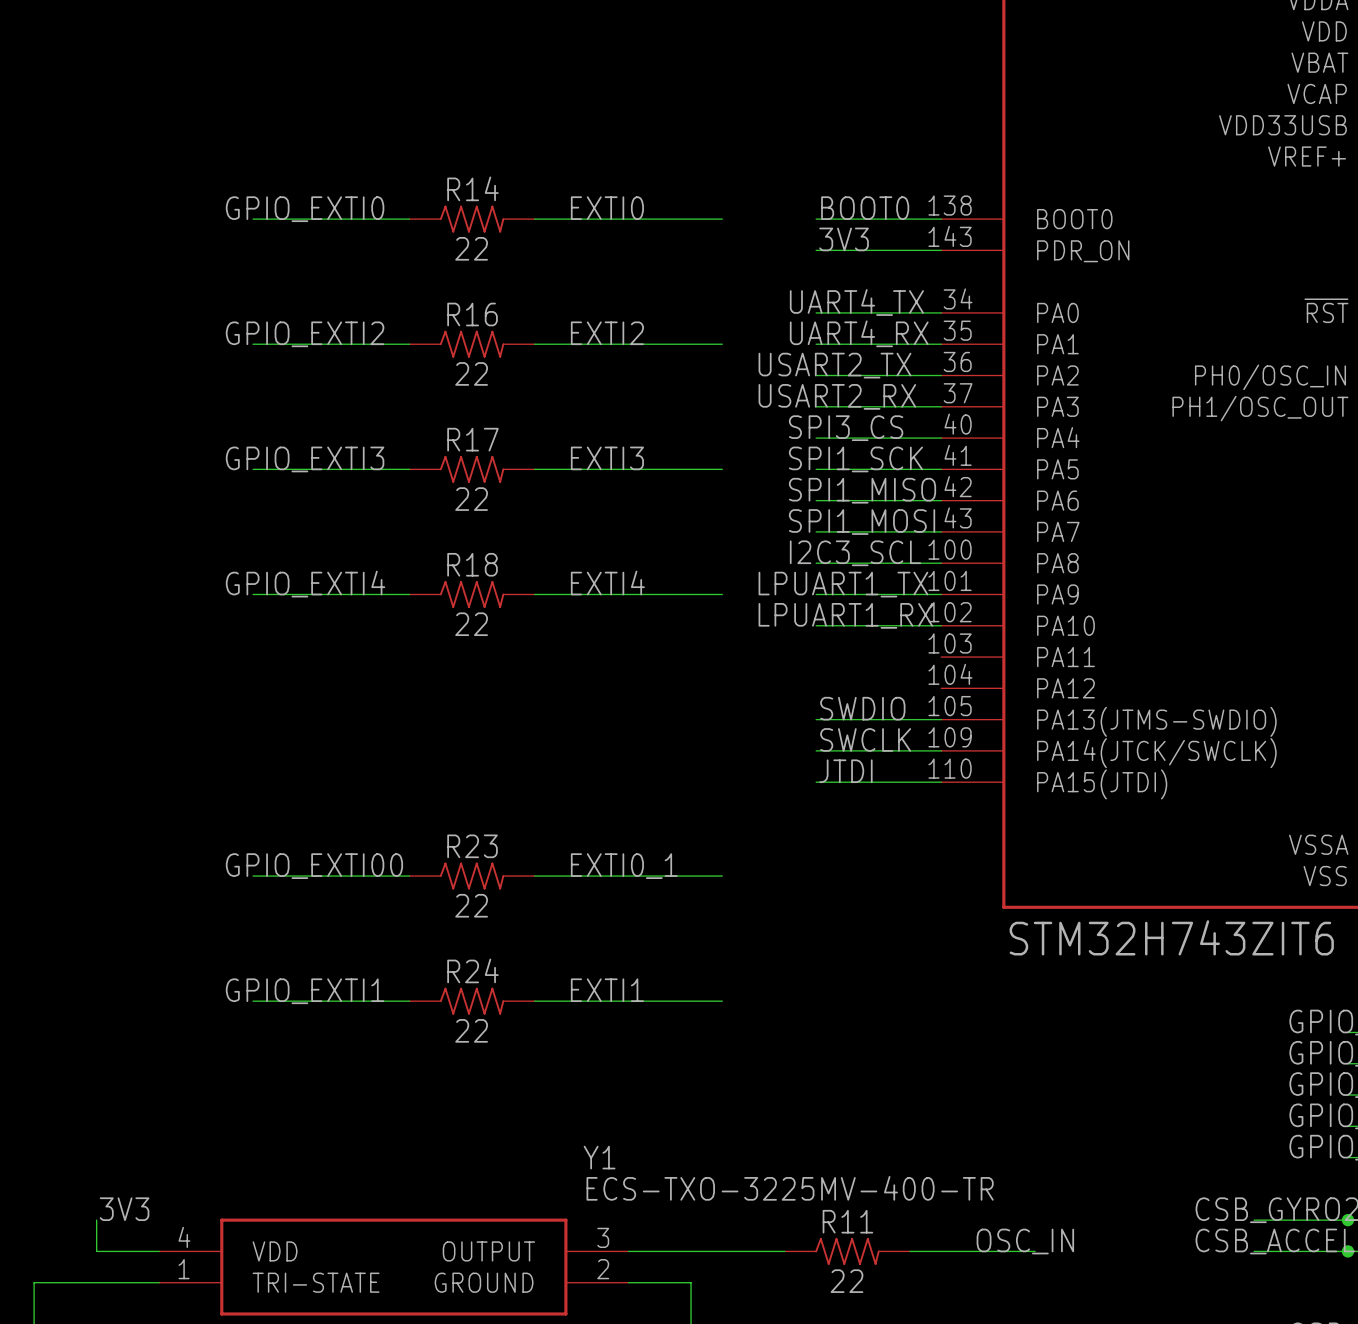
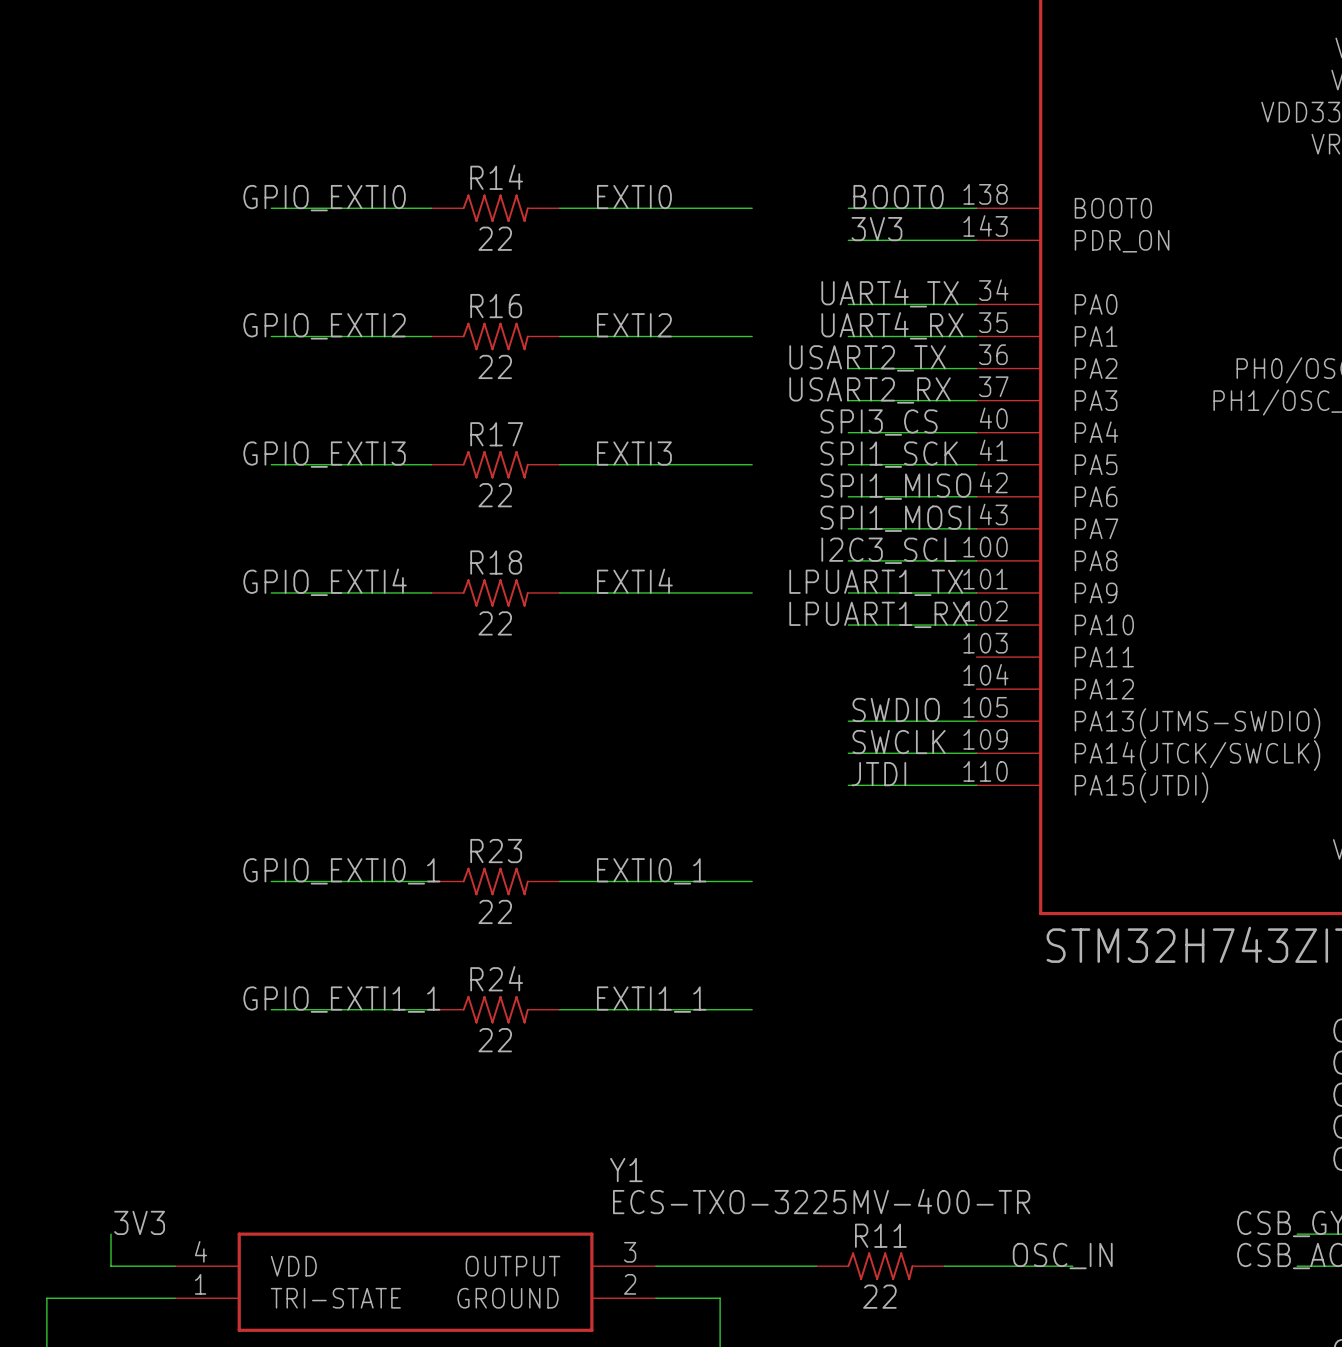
label: GPIO_EXTI00 (314, 866) -> GPIO_EXTI0_1 (341, 871)
label: EXTI1 (607, 990) -> EXTI1_1 (651, 999)
label: GPIO_EXTI1 (305, 991) -> GPIO_EXTI1_1 (341, 999)

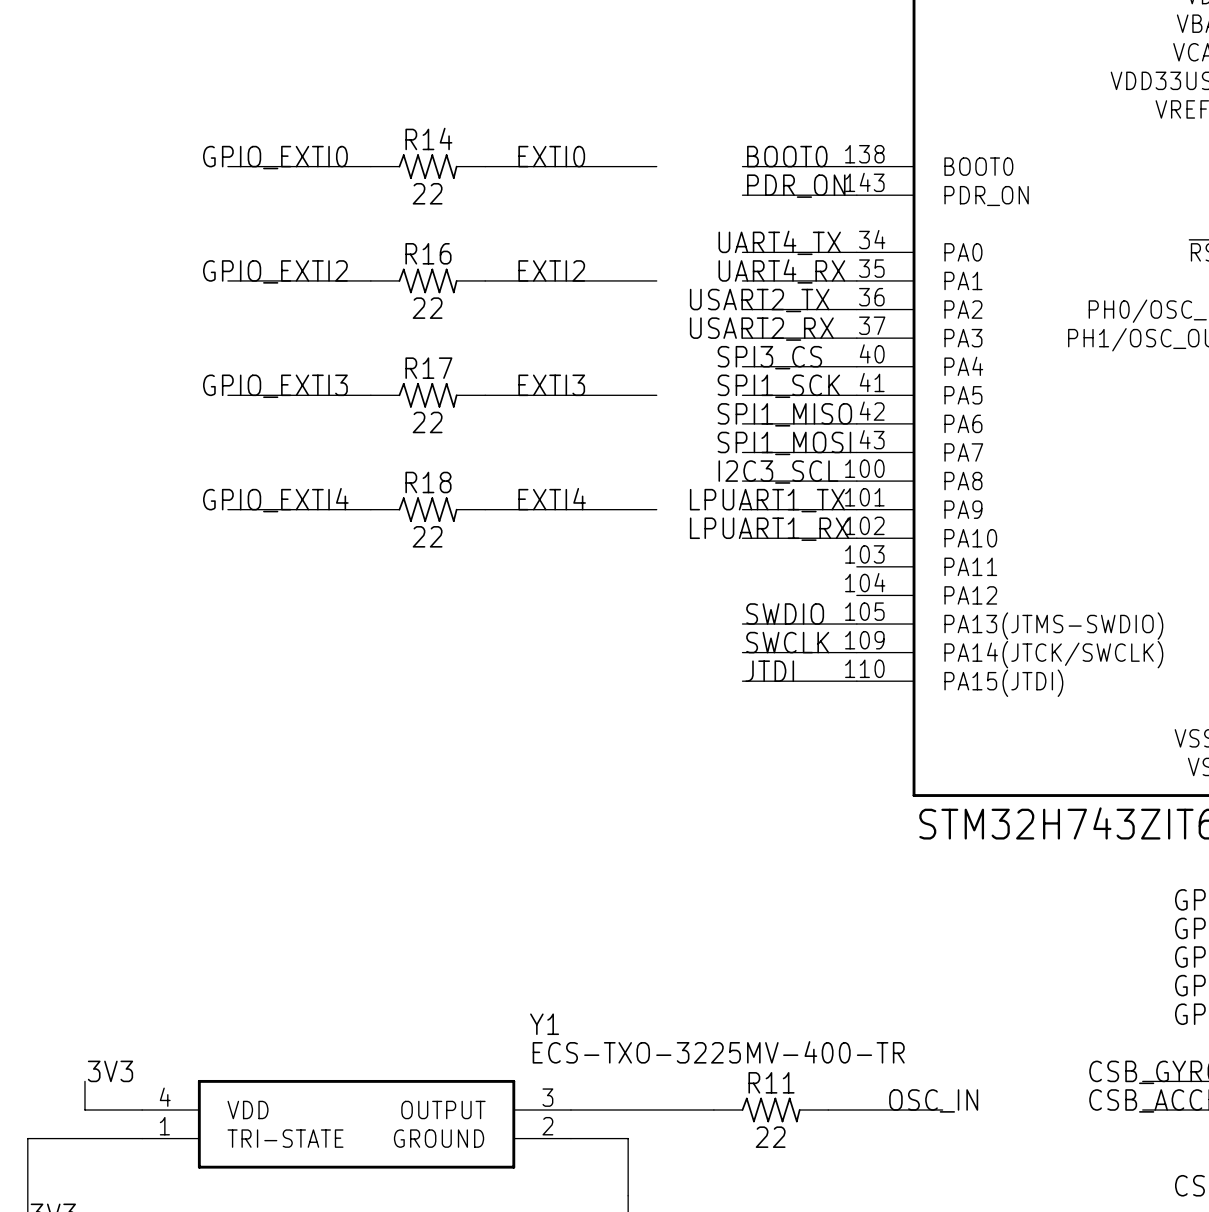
label: 3V3 (876, 229) -> PDR_ON (796, 186)
label: GPIO_EXTI0_1 (341, 871) -> none
label: EXTI0_1 (651, 871) -> none
wire: (271, 881) (431, 881) -> none
R23: 22 (495, 881) -> none
wire: (559, 881) (752, 881) -> none
label: GPIO_EXTI1_1 (341, 999) -> none
label: EXTI1_1 (651, 999) -> none
wire: (271, 1009) (431, 1009) -> none
R24: 22 (495, 1009) -> none
wire: (559, 1009) (752, 1009) -> none

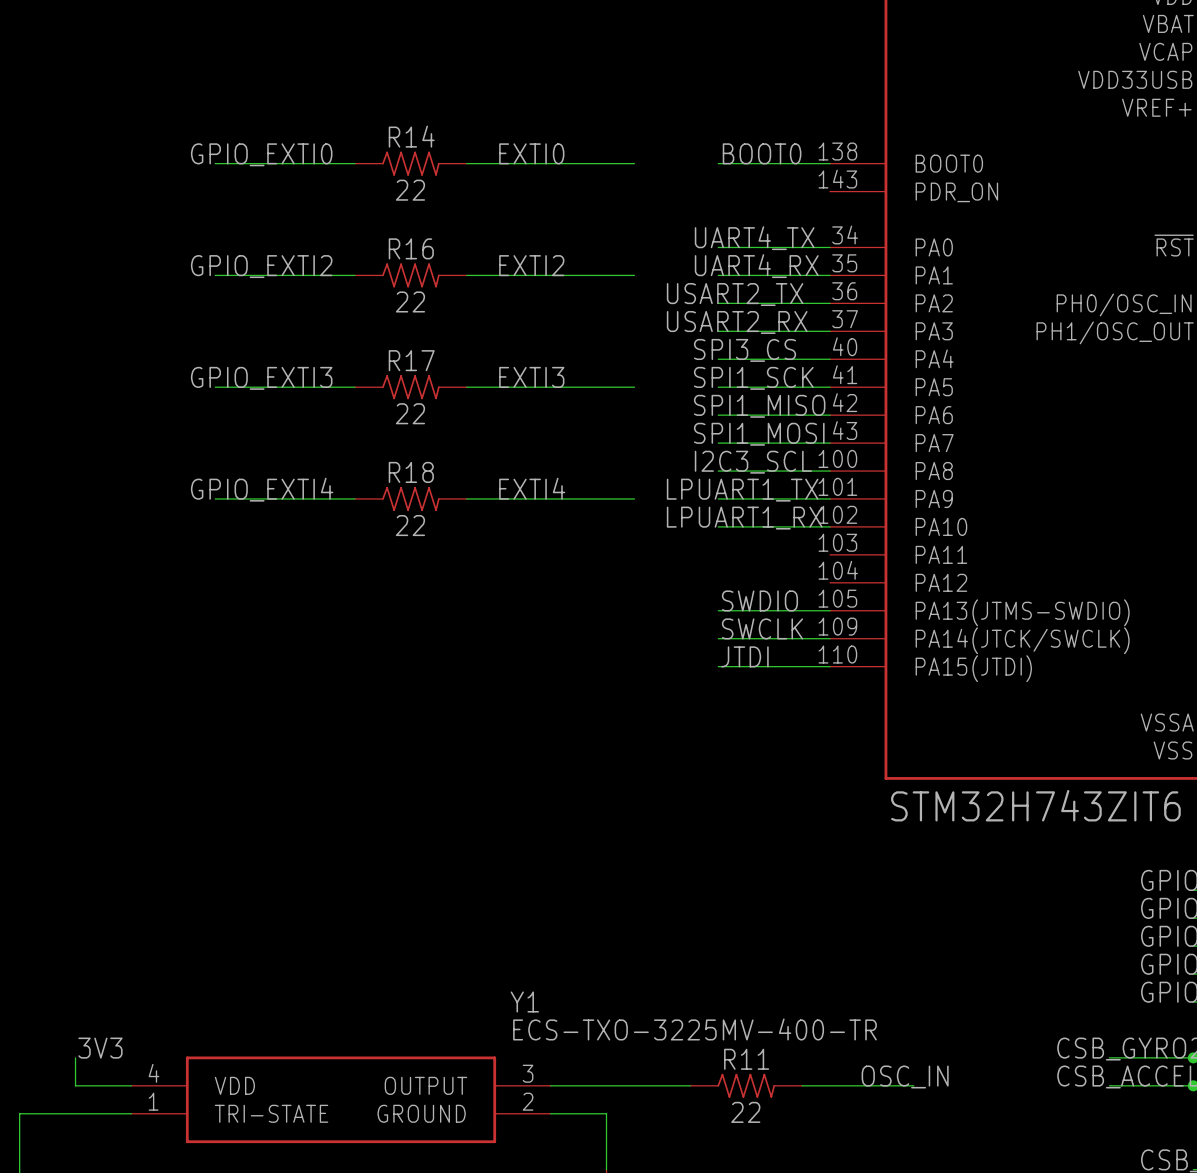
label: PDR_ON (796, 186) -> none
wire: (742, 195) (856, 195) -> none

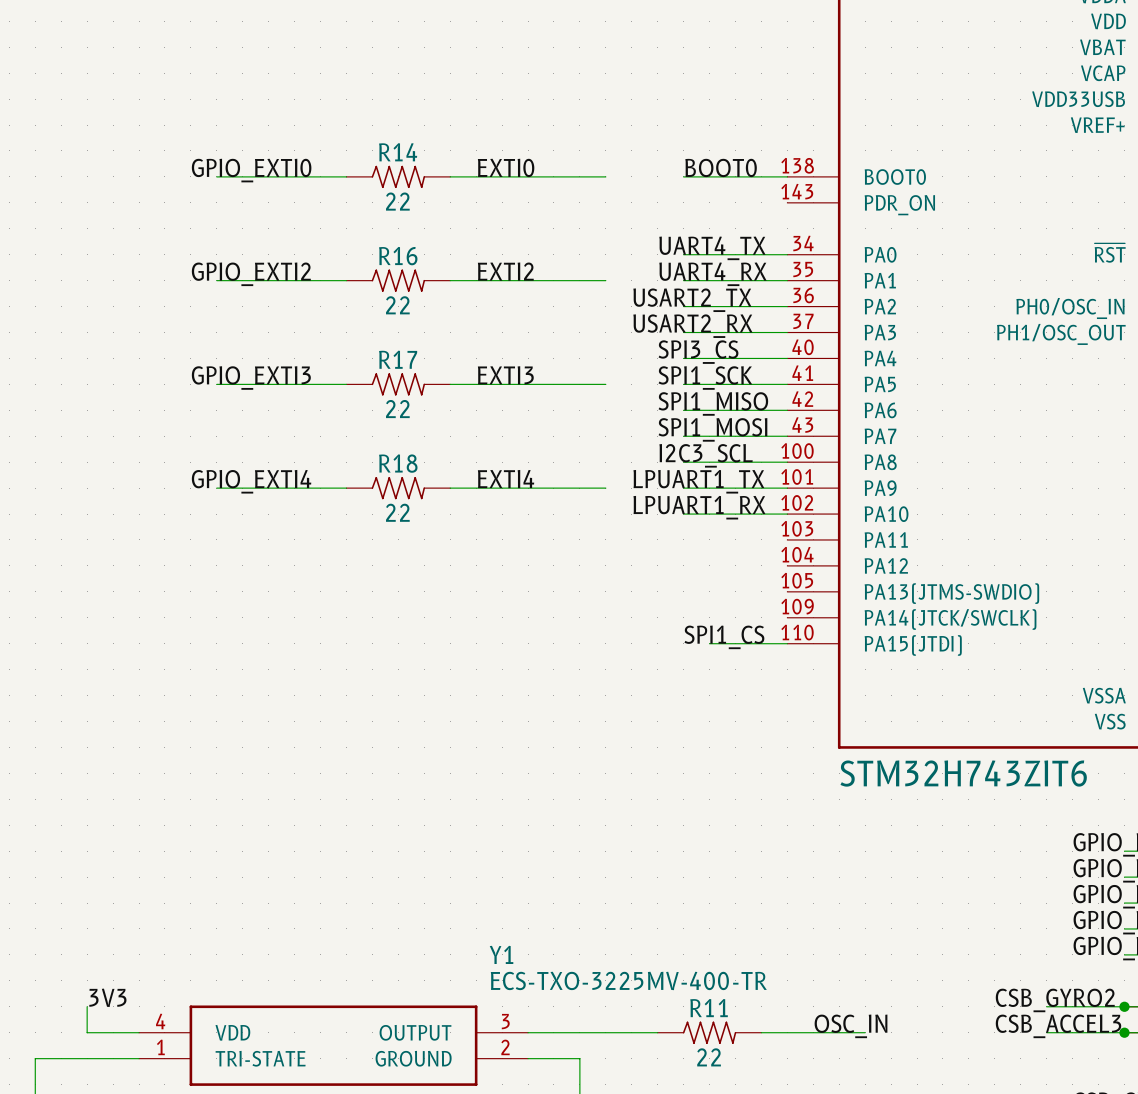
label: SWDIO (759, 600) -> none
wire: (718, 610) (830, 610) -> none
label: SWCLK (762, 628) -> none
wire: (718, 638) (830, 638) -> none
label: JTDI (744, 656) -> SPI1_CS (724, 637)
wire: (718, 666) (746, 666) -> none

